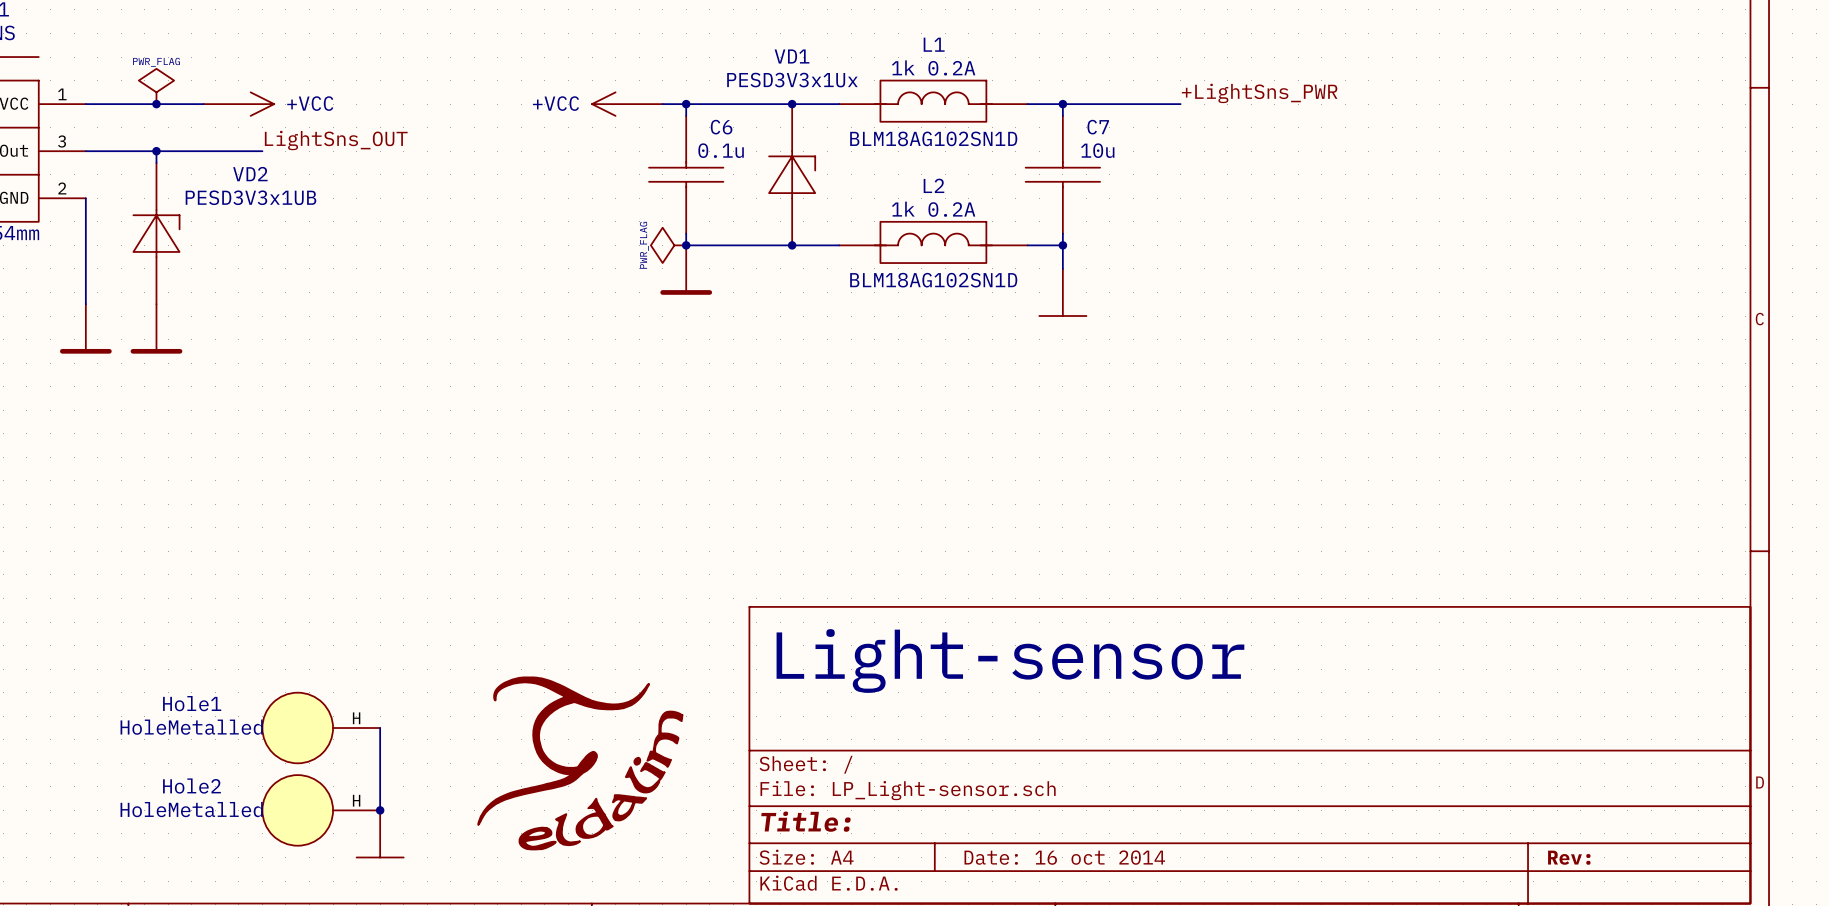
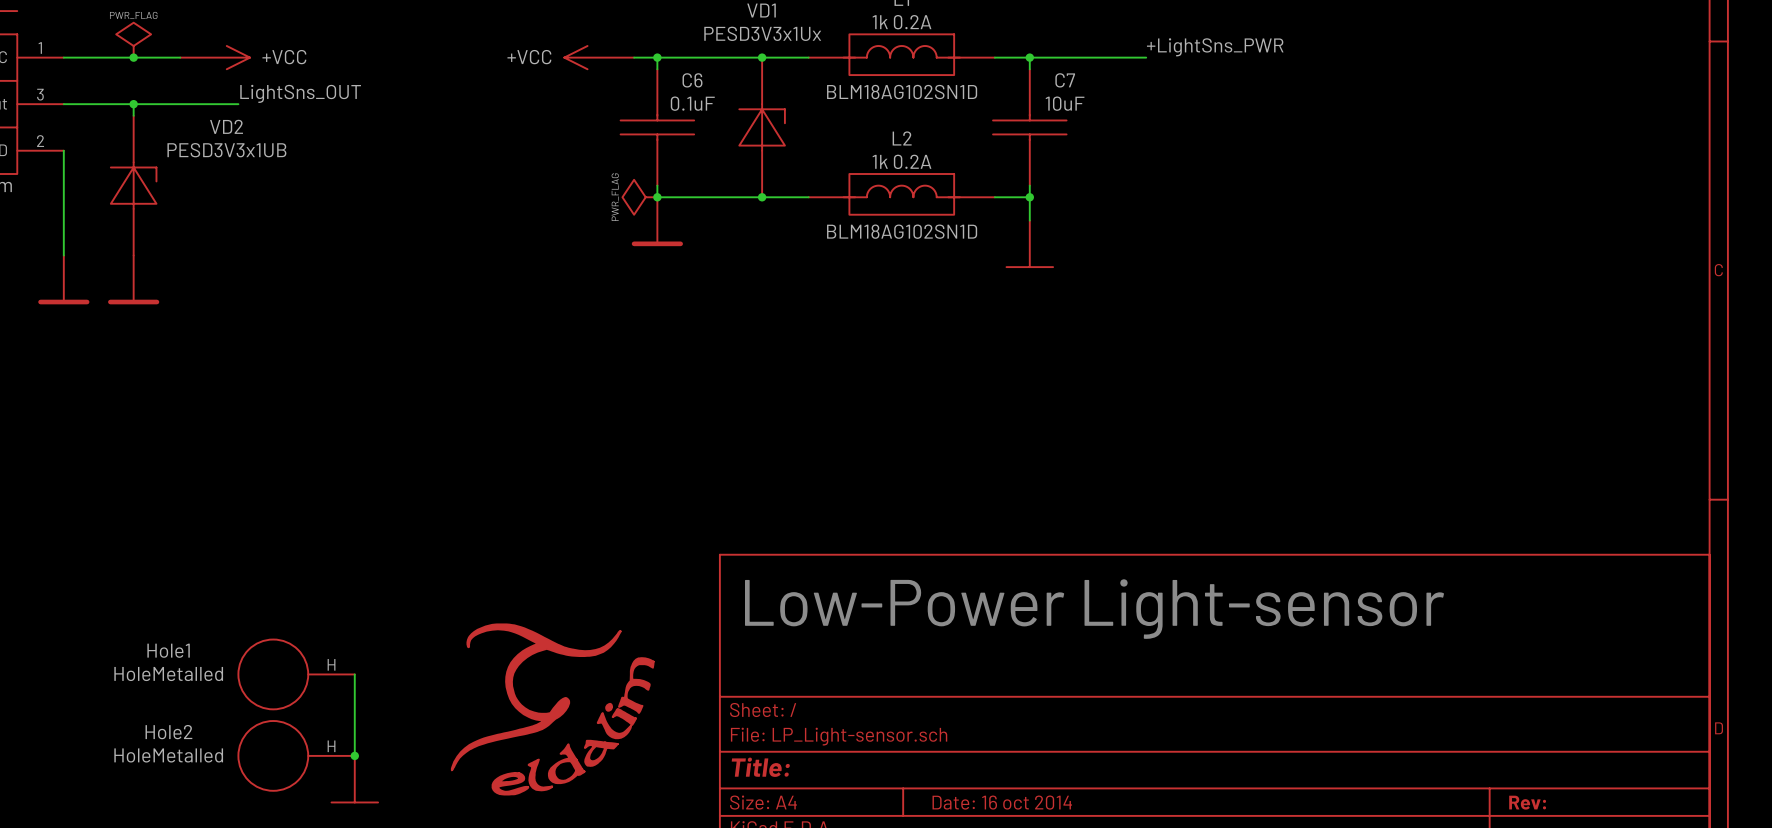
C6 value: 0.1u (721, 150) -> 0.1uF (692, 103)
C7 value: 10u (1097, 150) -> 10uF (1065, 103)
text: Light-sensor (1010, 661) -> Low-Power Light-sensor (1094, 609)

